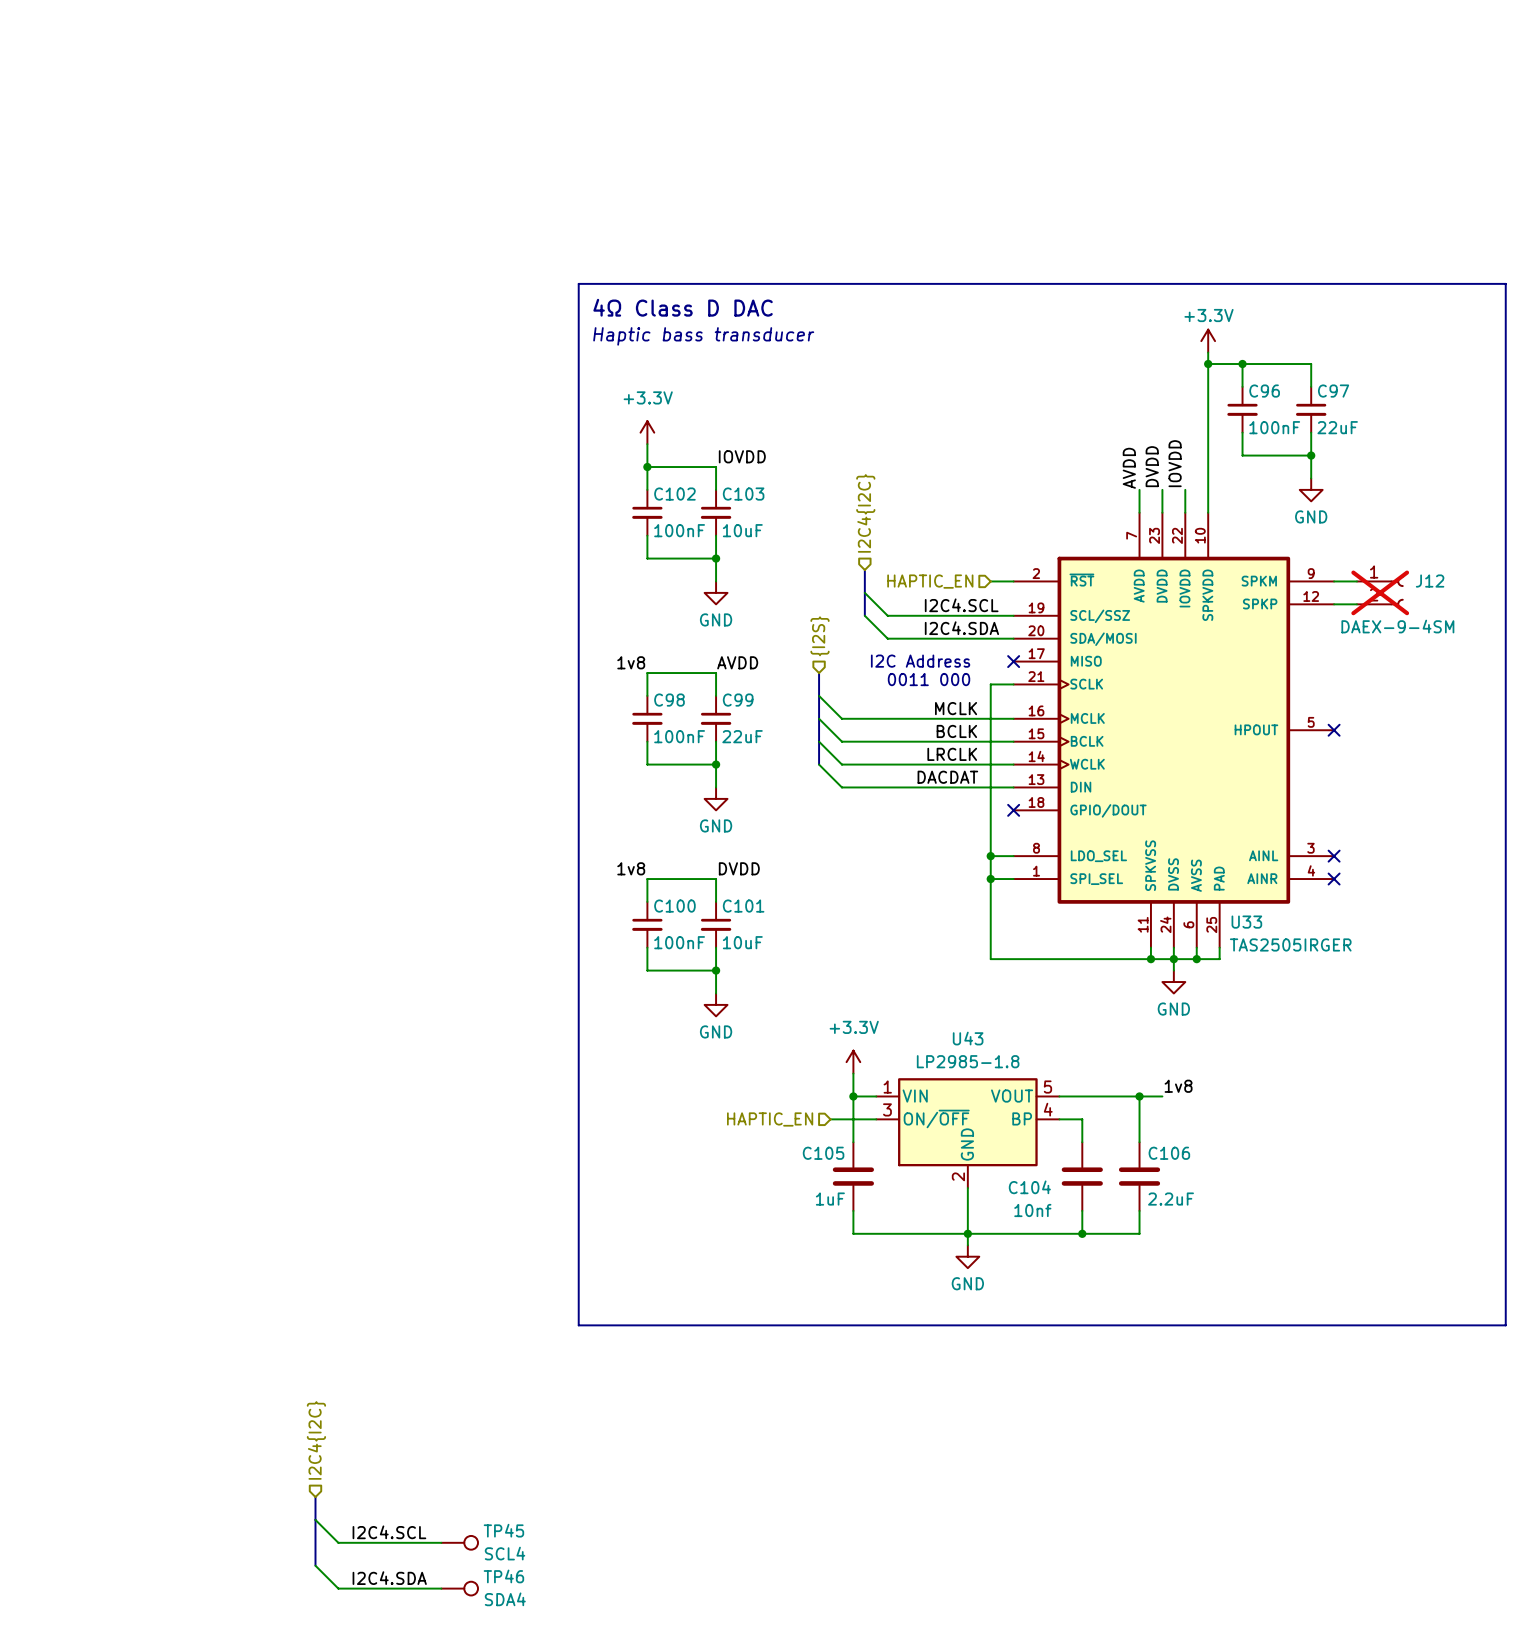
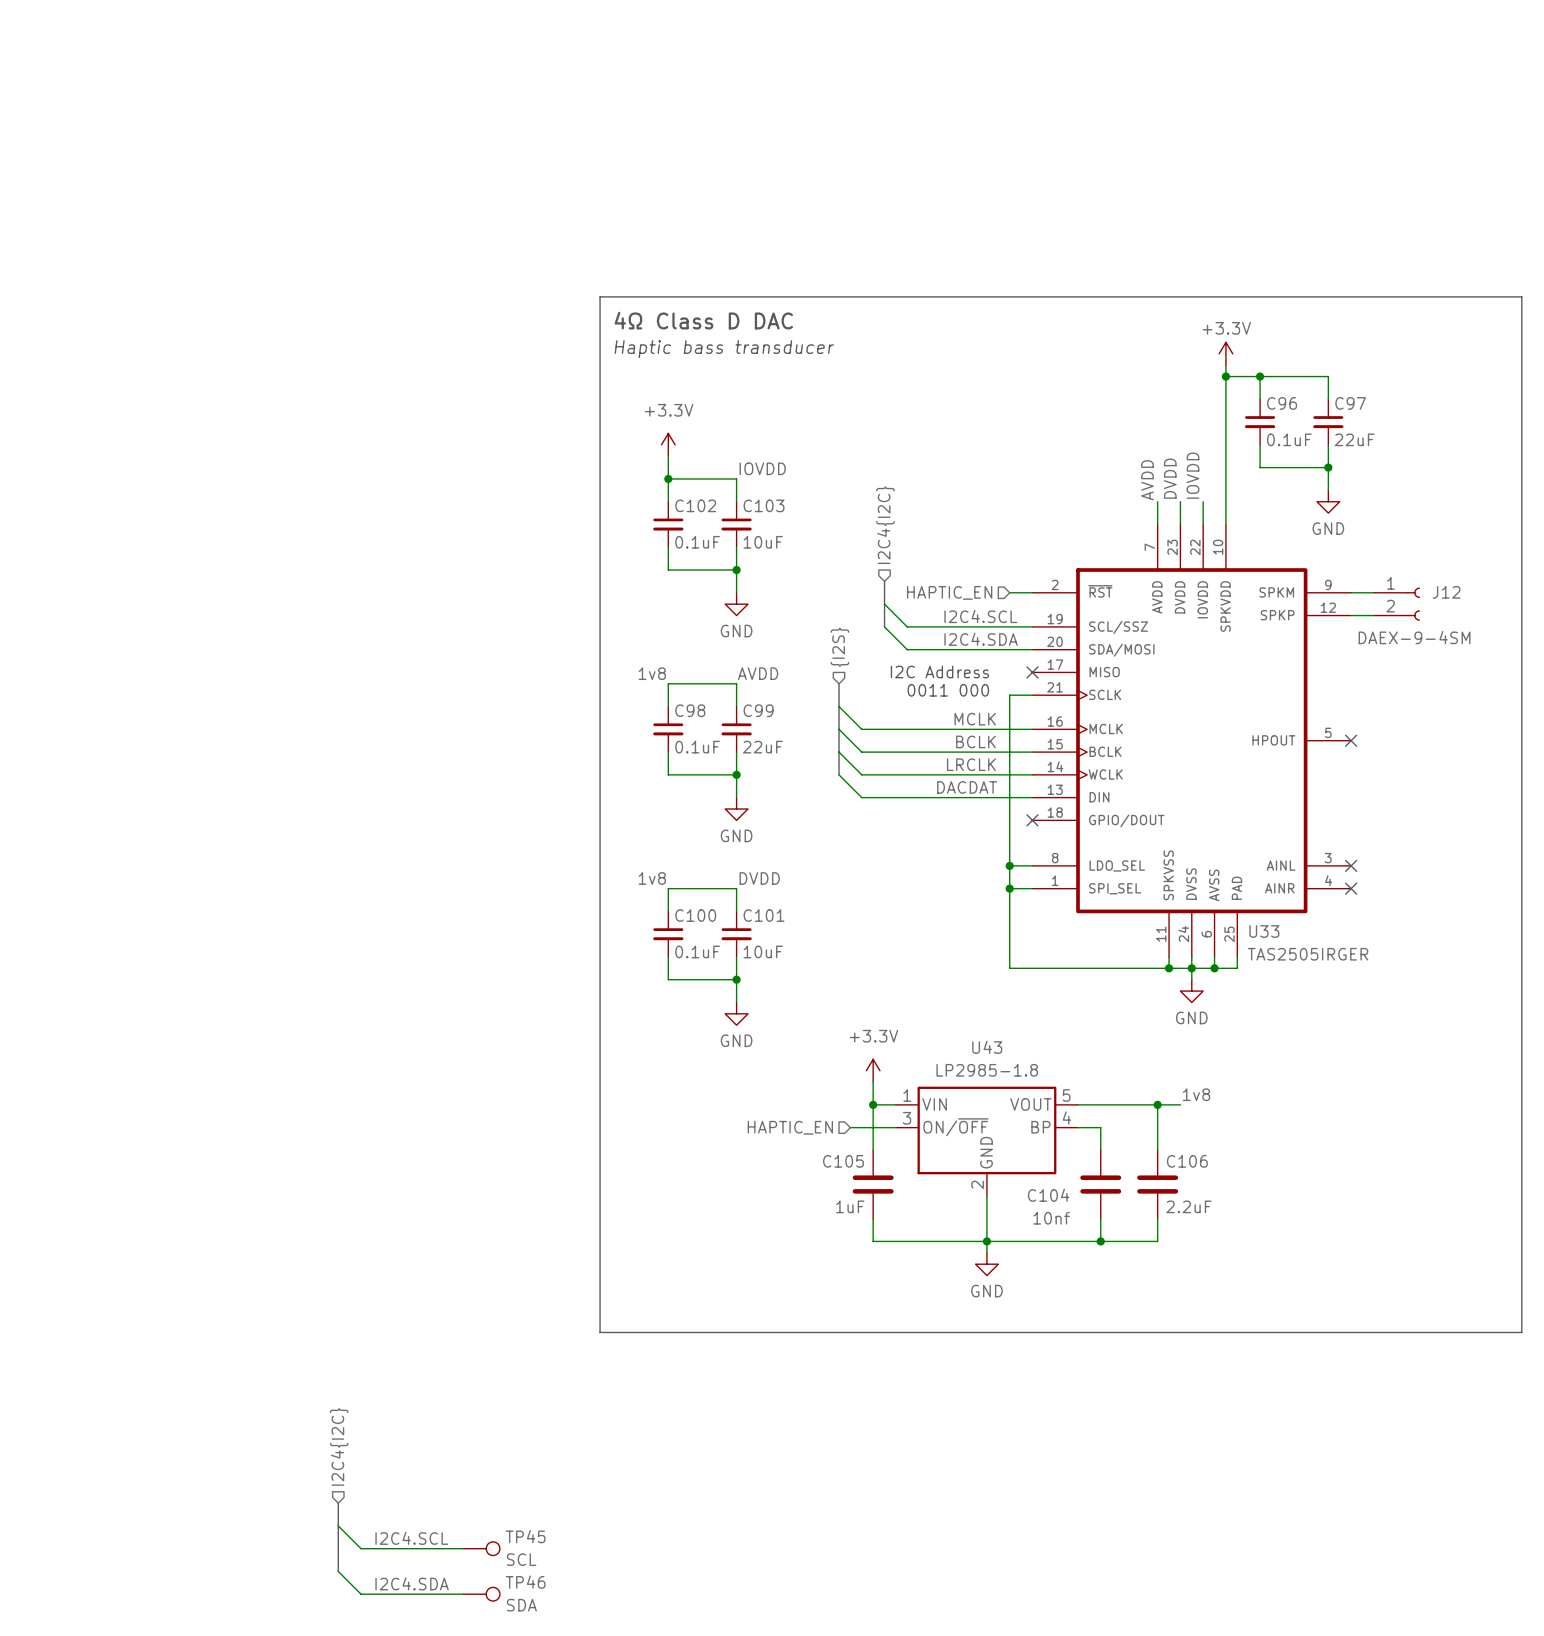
C96 value: 100nF (1274, 427) -> 0.1uF (1289, 439)
C102 value: 100nF (679, 530) -> 0.1uF (697, 542)
J12 do-not-place cross: (1380, 592) -> none
C98 value: 100nF (679, 736) -> 0.1uF (697, 747)
C100 value: 100nF (679, 942) -> 0.1uF (697, 951)
TP45 value: SCL4 (505, 1553) -> SCL (521, 1559)
TP46 value: SDA4 (505, 1599) -> SDA (521, 1605)

